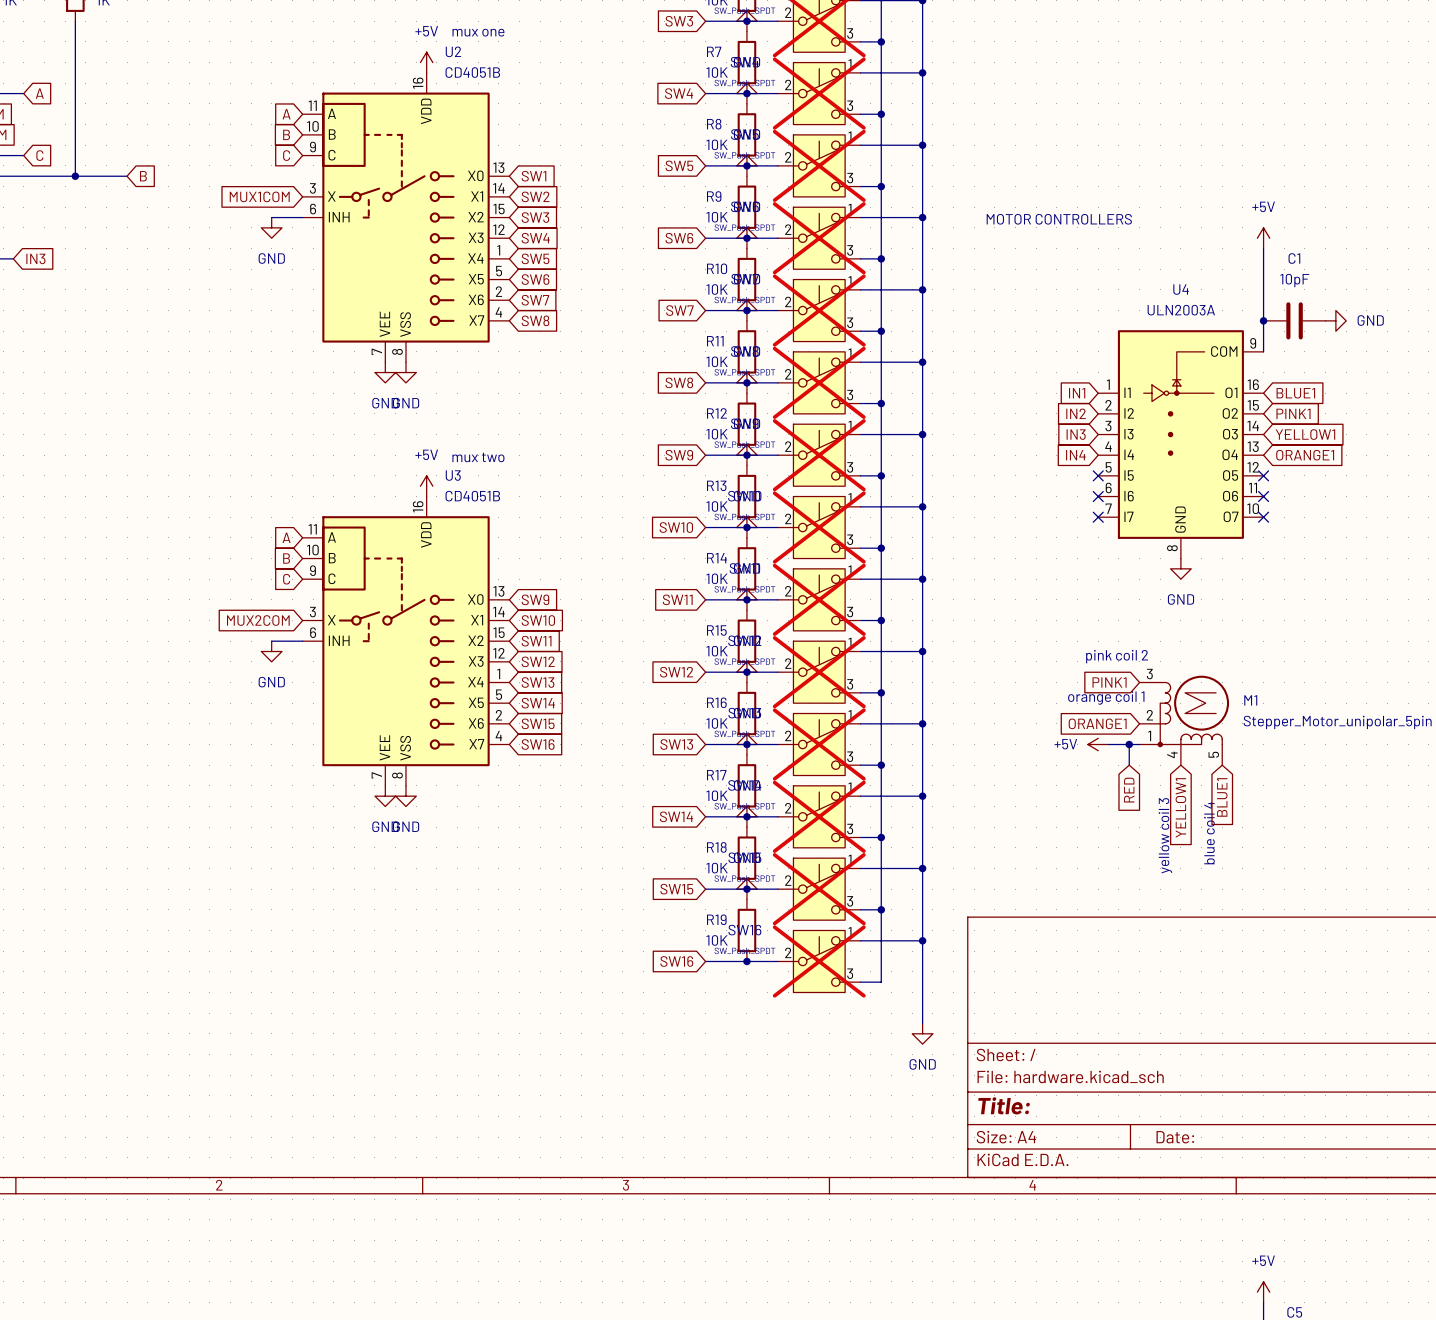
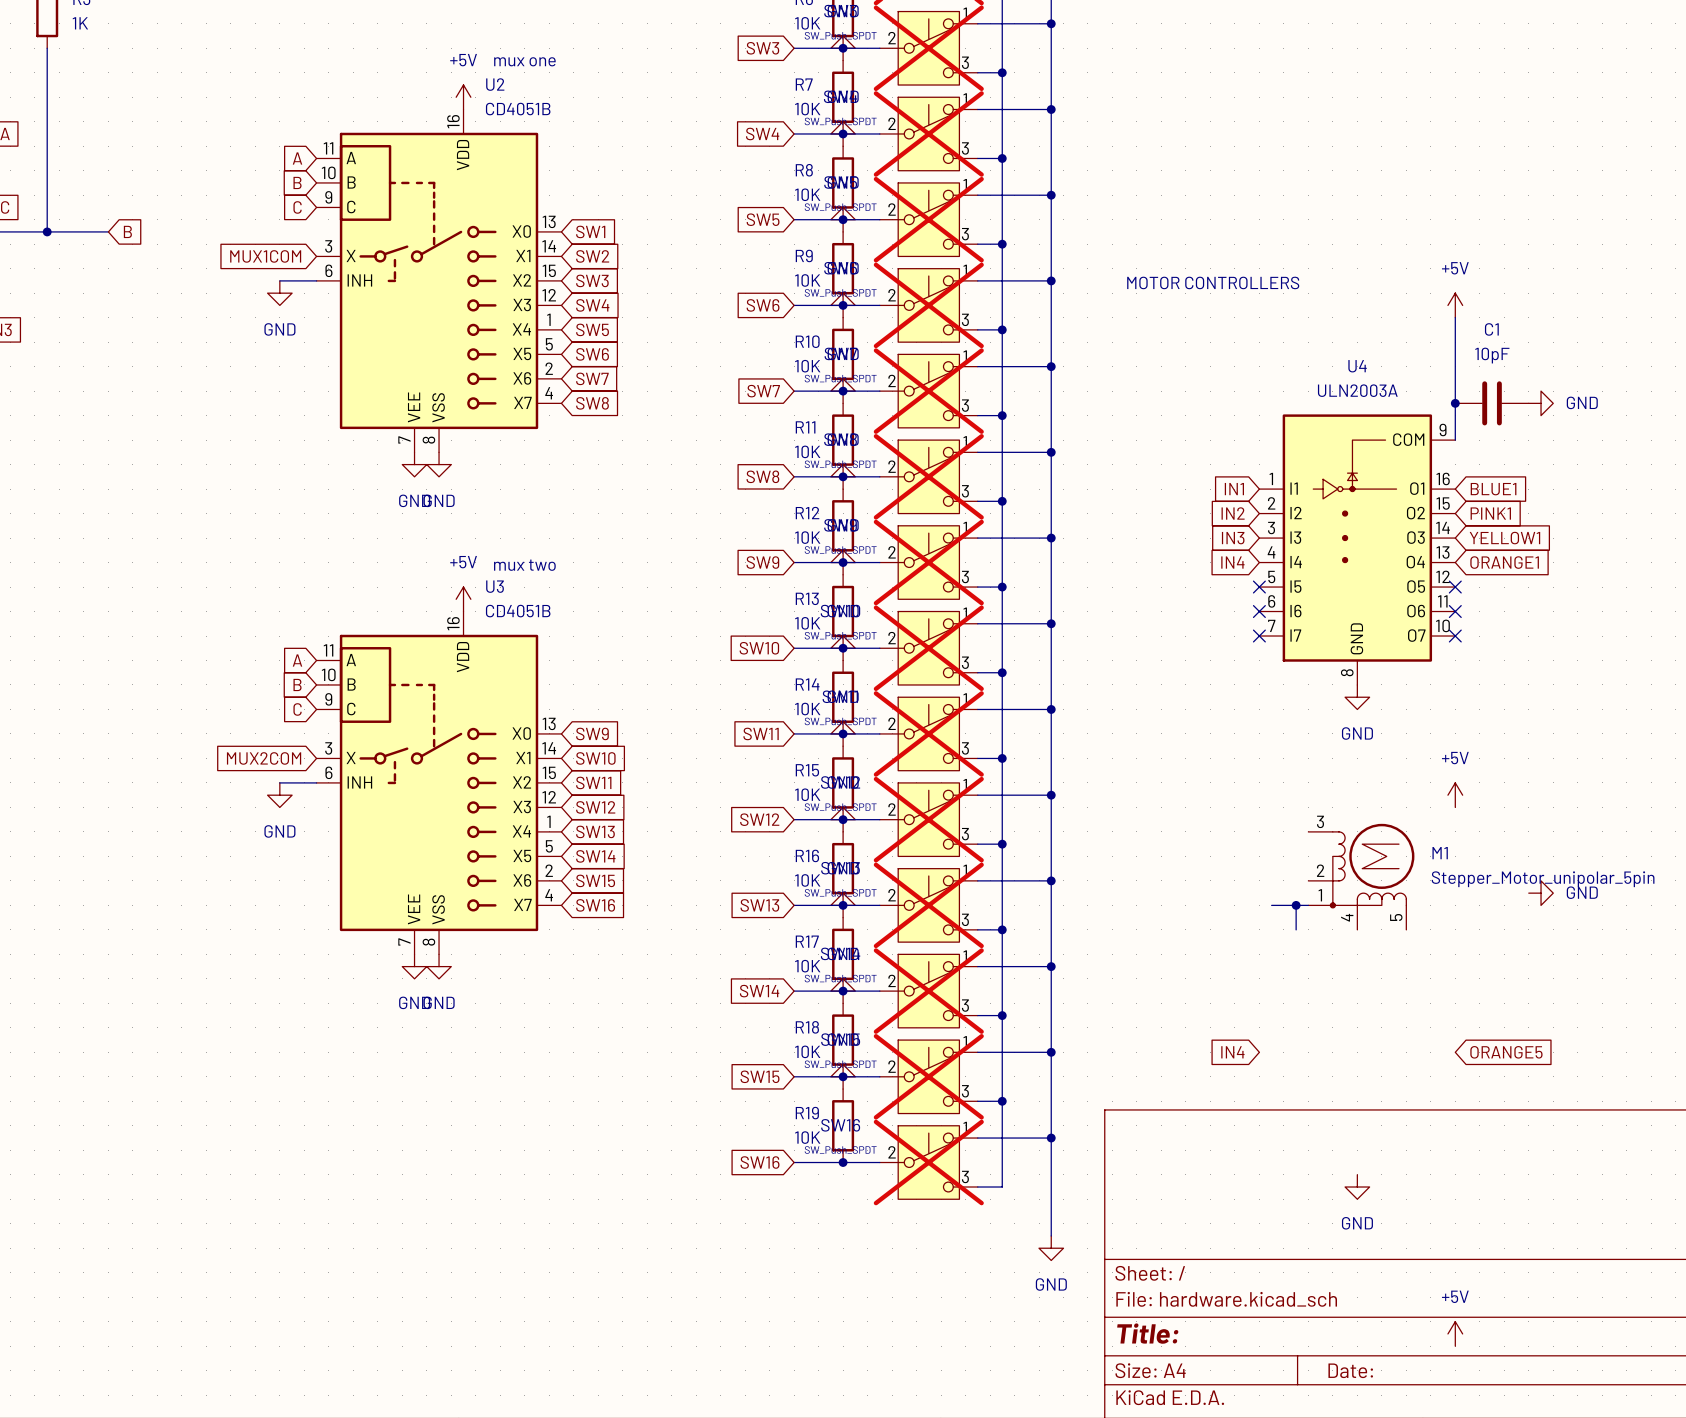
text: pink coil 2 (1117, 656) -> none
global label: PINK1 (1109, 682) -> none
text: orange coil 1 (1106, 698) -> none
global label: ORANGE1 (1097, 723) -> none
power symbol: none -> GND (1541, 893)
power symbol rotation: 0° (1098, 744) -> 90° clockwise (1455, 795)
power symbol position: +5V (1098, 744) -> +5V (1455, 795)
global label: RED (1129, 790) -> none
global label: BLUE1 (1222, 797) -> none
global label: YELLOW1 (1180, 807) -> none
text: blue coil 4 (1209, 833) -> none
text: yellow coil 3 (1165, 835) -> none
global label: none -> IN4 (1232, 1052)
global label: none -> ORANGE5 (1506, 1052)
power symbol: none -> GND (1357, 1187)
power symbol: none -> +5V (1455, 1333)

